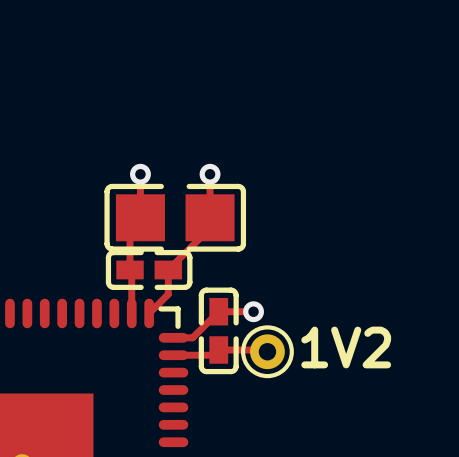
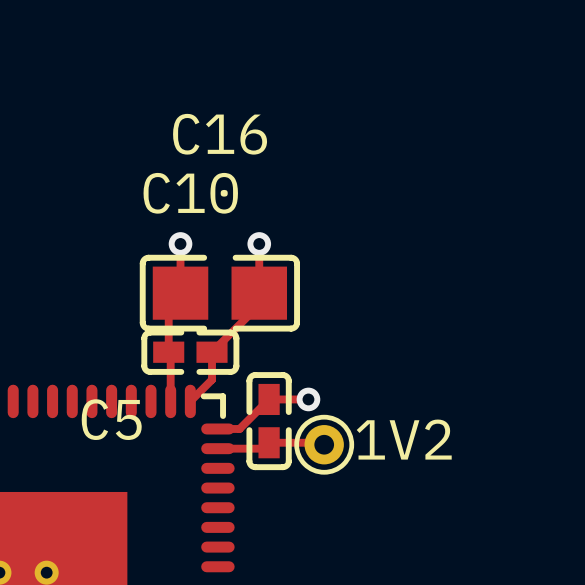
C10 name: none -> C10 (190, 193)
C16: none -> (219, 293)
C5 name: none -> C5 (111, 419)

